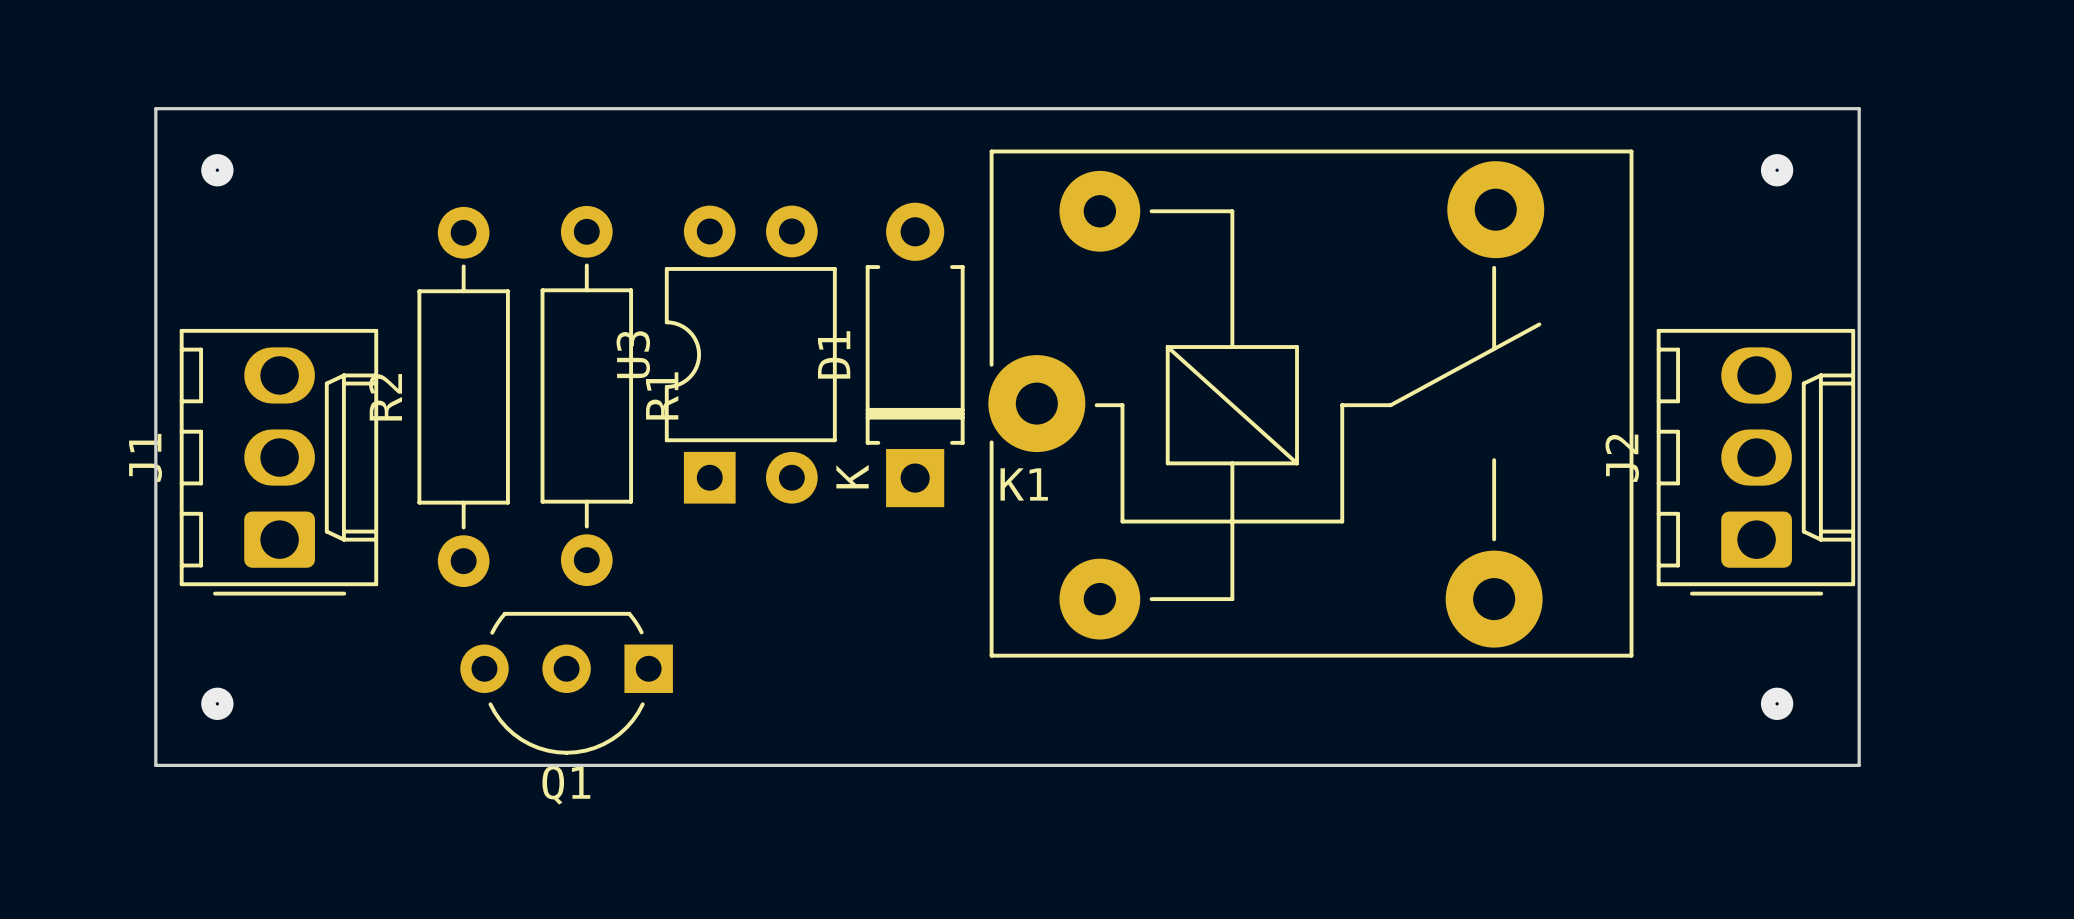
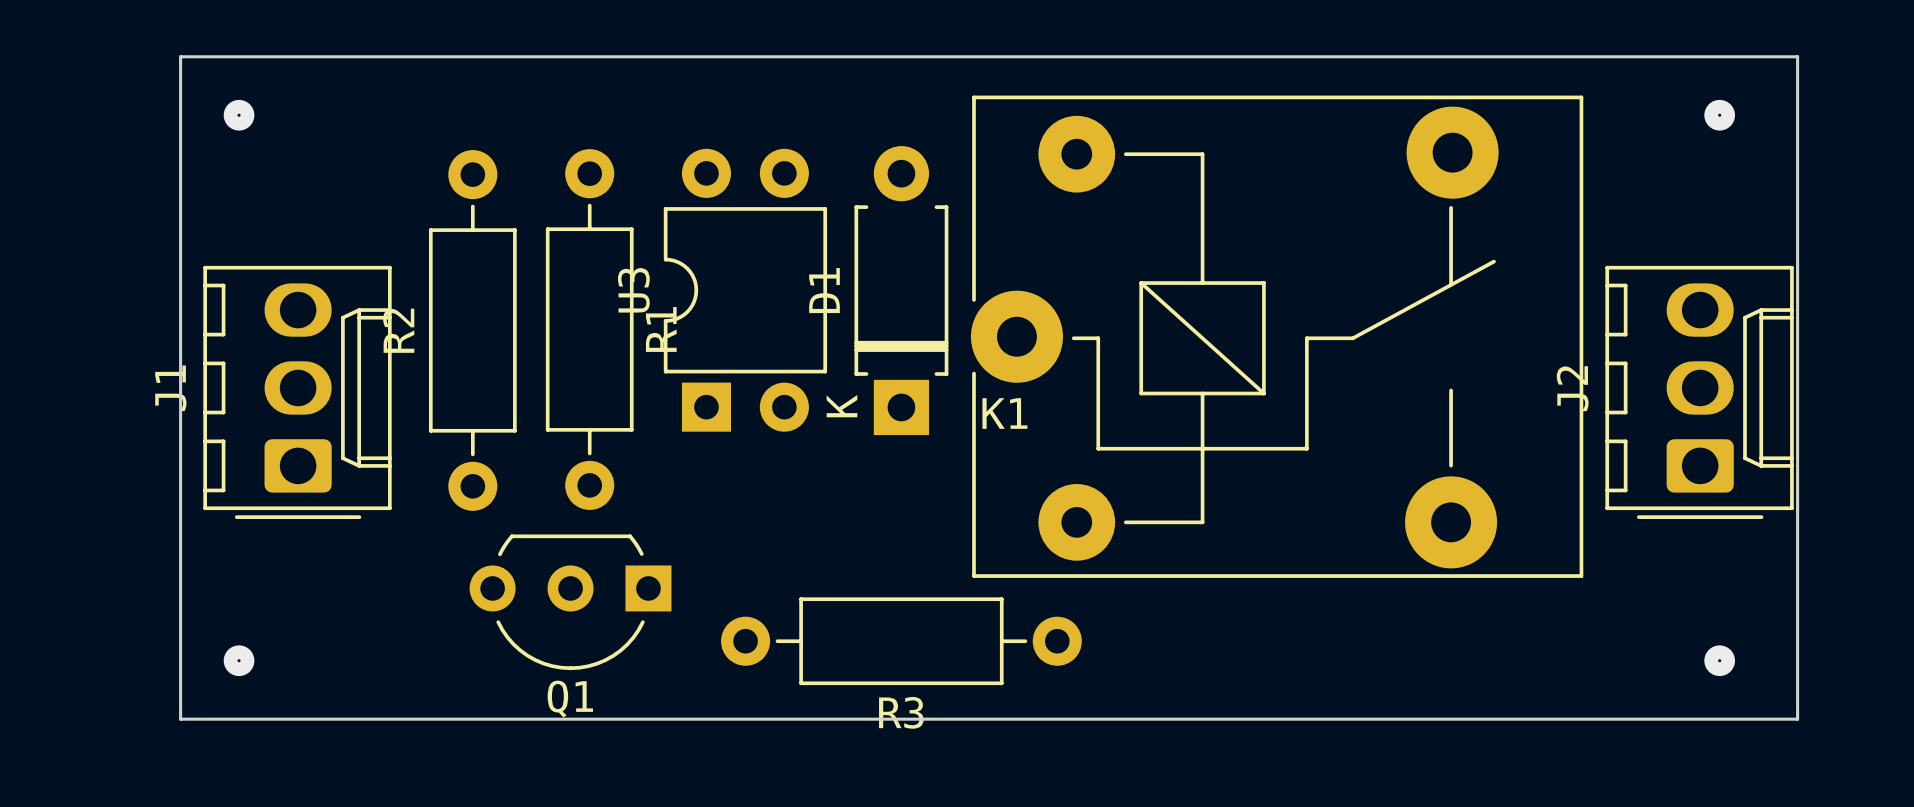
via position: (217, 703) -> (239, 660)
via position: (1777, 703) -> (1719, 660)
R3: none -> (901, 641)
board edge: (155, 765) (1859, 765) -> (180, 680) (180, 719) (1797, 719) (1797, 680)

